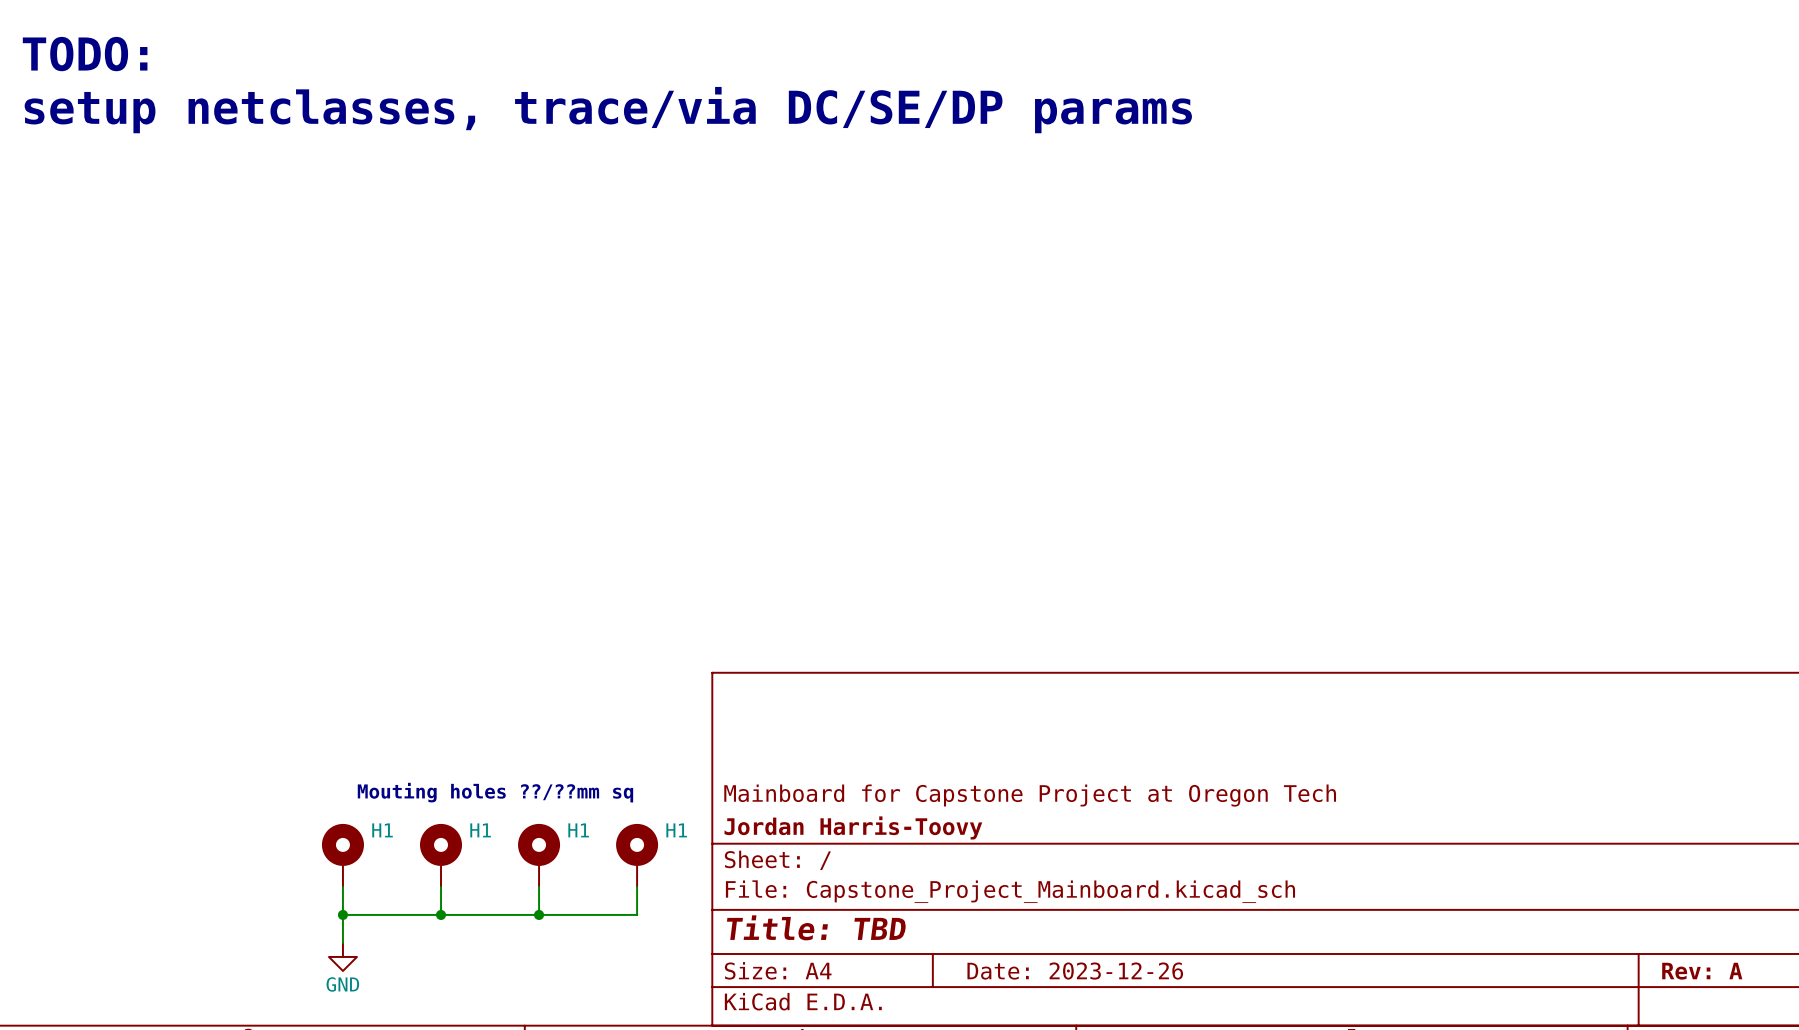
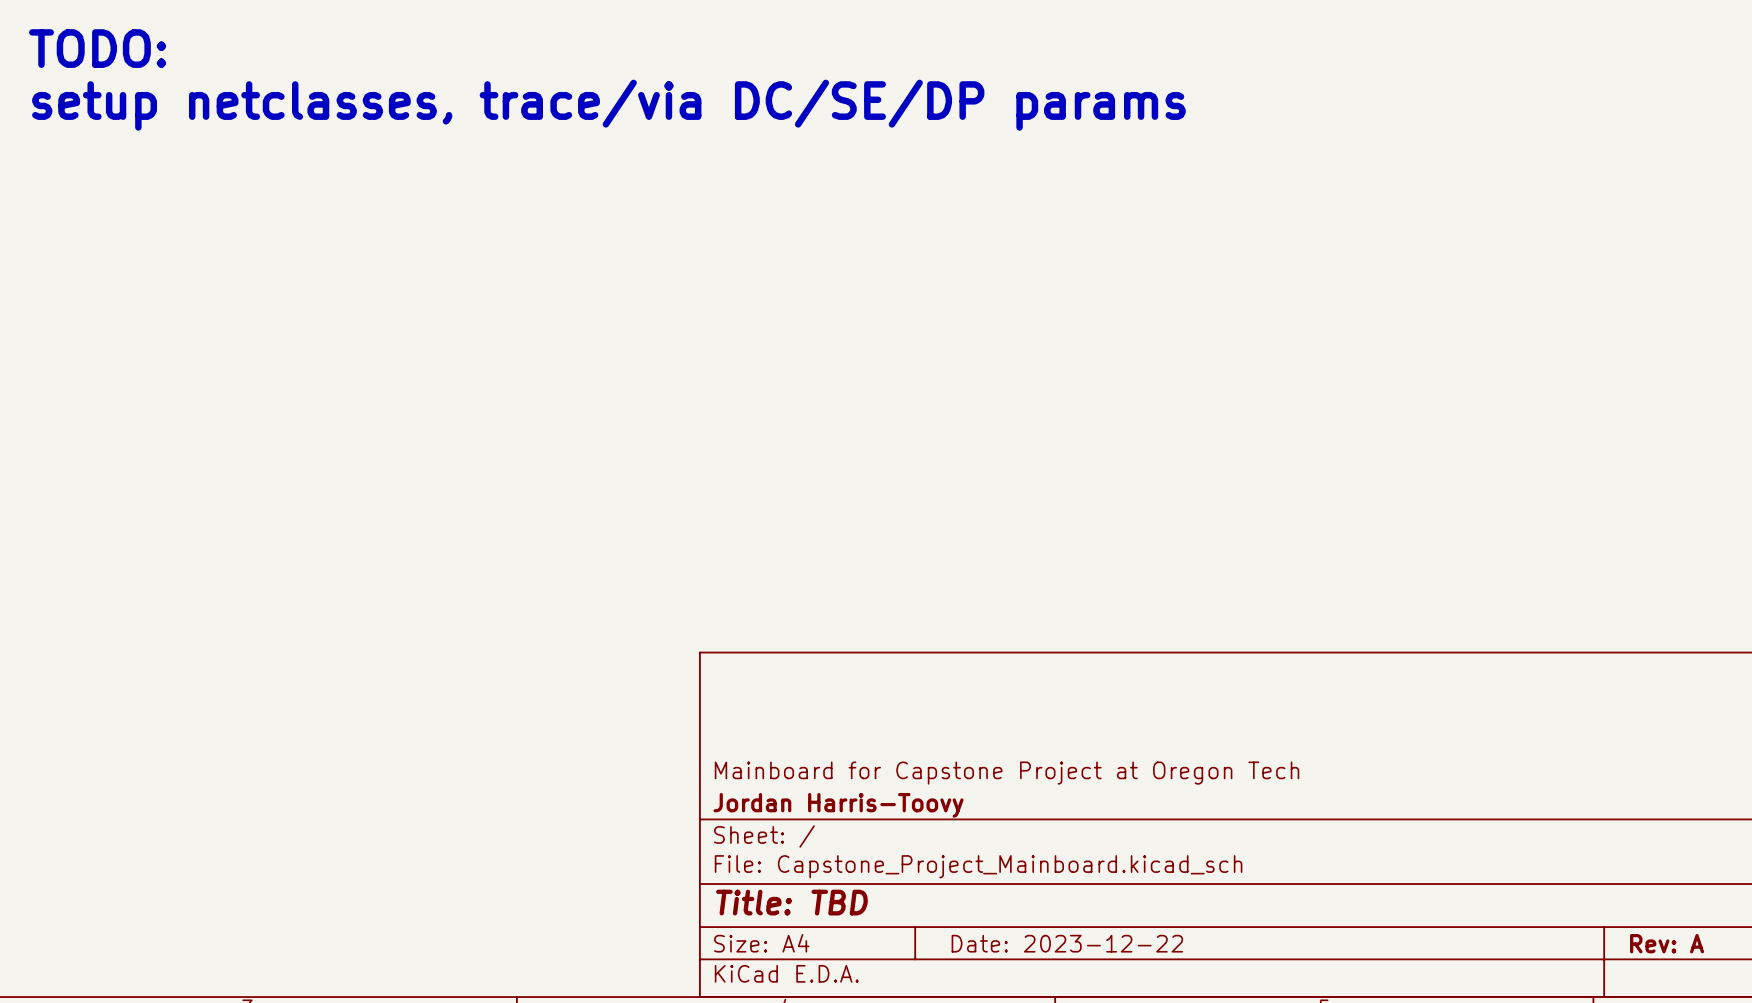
text: Mouting holes ??/??mm sq (495, 792) -> none
H1: (342, 855) -> none
H1: (441, 855) -> none
H1: (539, 855) -> none
H1: (637, 855) -> none
wire: (342, 886) (342, 942) -> none
wire: (441, 886) (441, 914) -> none
wire: (539, 886) (539, 914) -> none
wire: (637, 886) (637, 914) (342, 914) -> none
junction: (342, 914) -> none
junction: (441, 914) -> none
junction: (539, 914) -> none
power symbol: GND (342, 956) -> none
title block: Date: 2023-12-26 (1075, 971) -> Date: 2023-12-22 (1067, 943)

